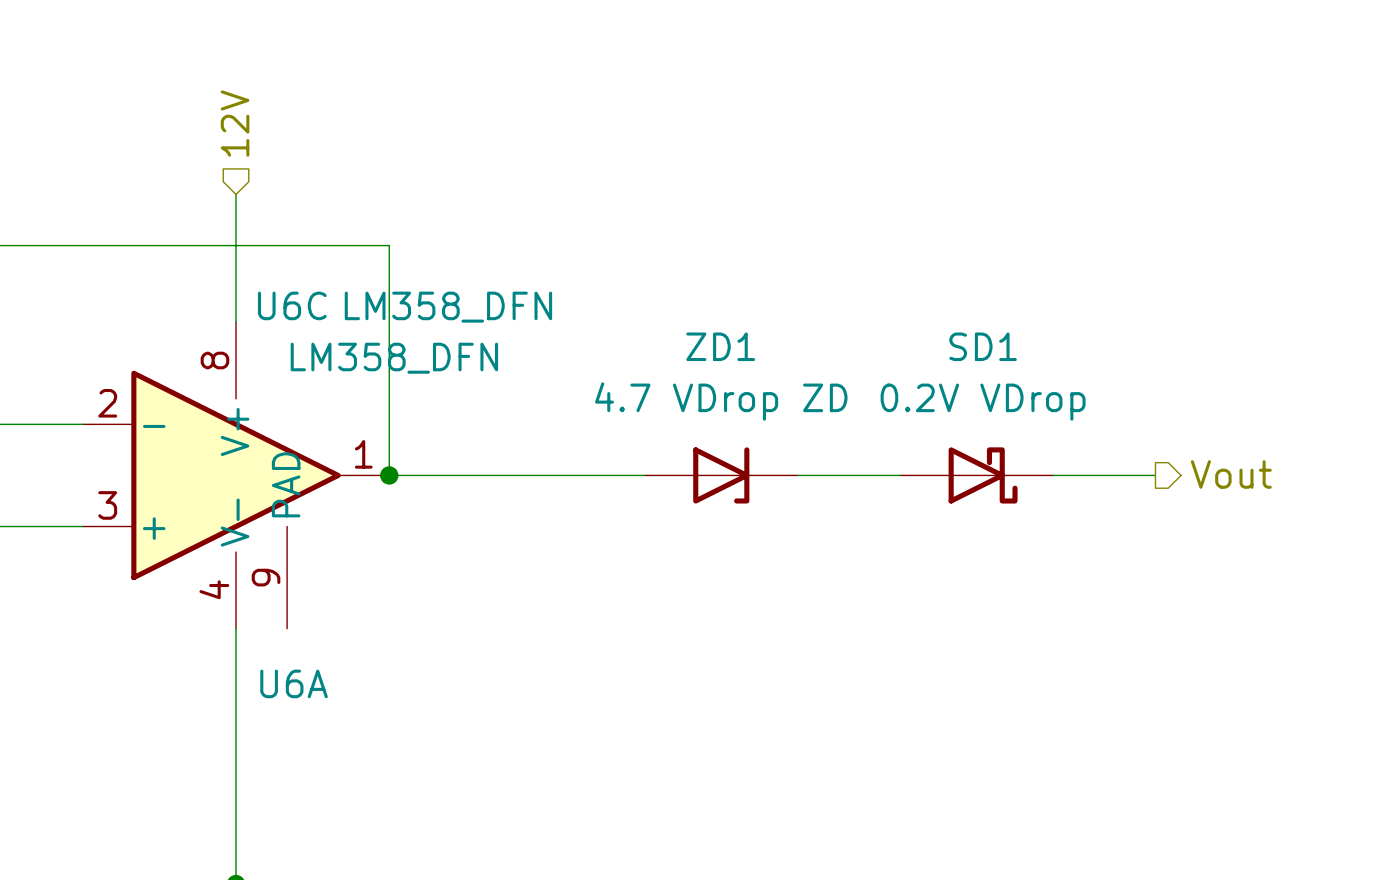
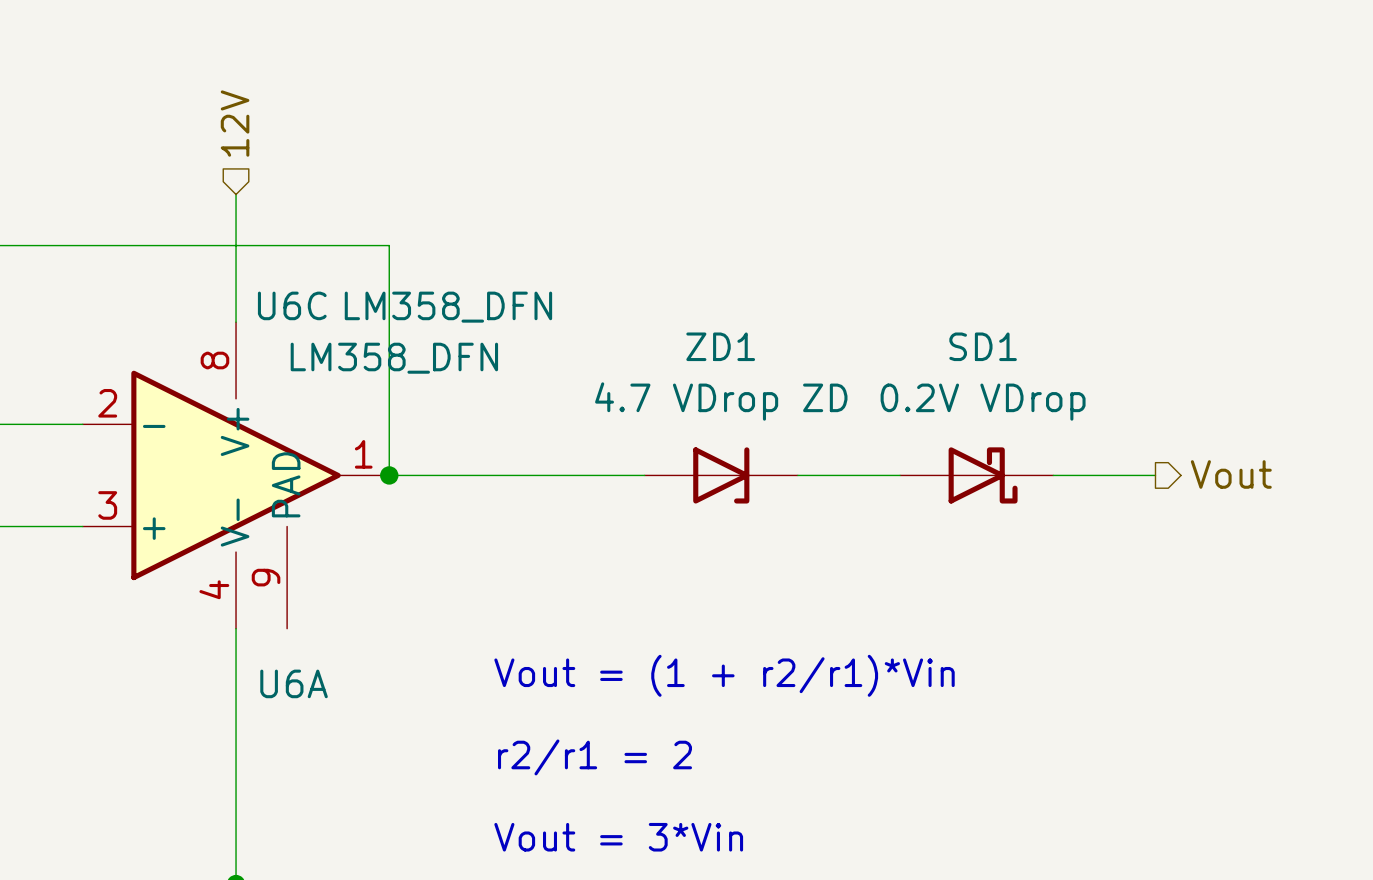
text: none -> Vout = (1 + r2/r1)*Vin (724, 675)
text: none -> r2/r1 = 2 (595, 757)
text: none -> Vout = 3*Vin (618, 837)

